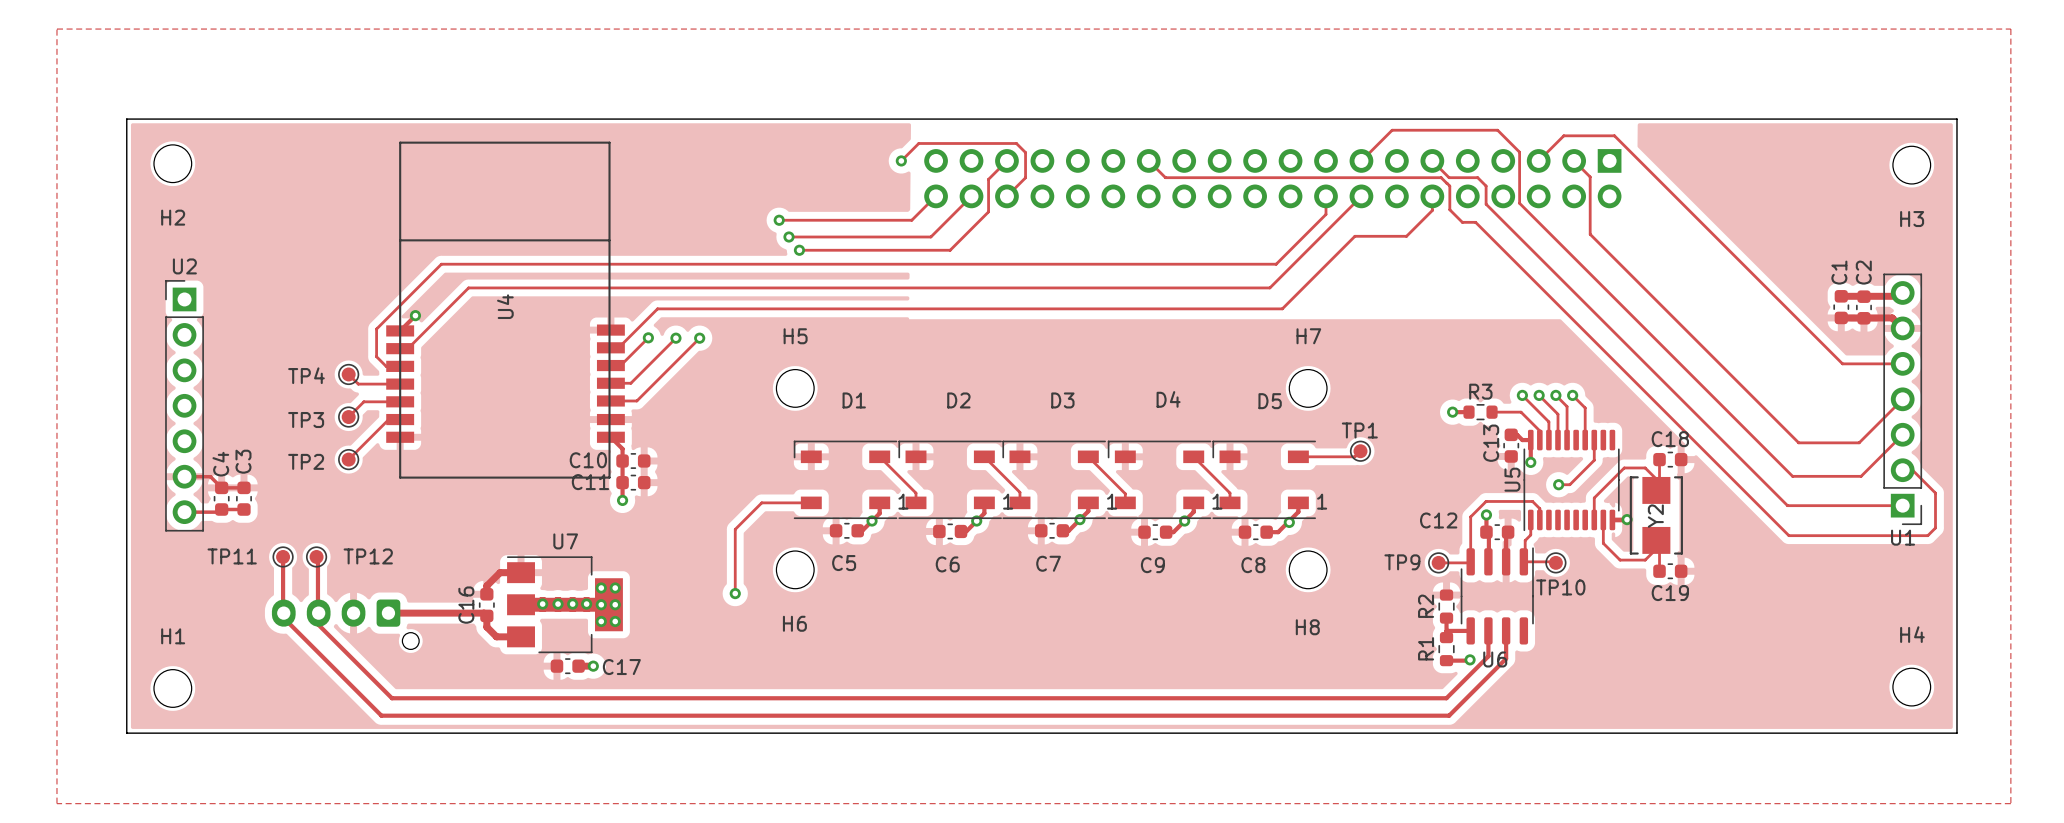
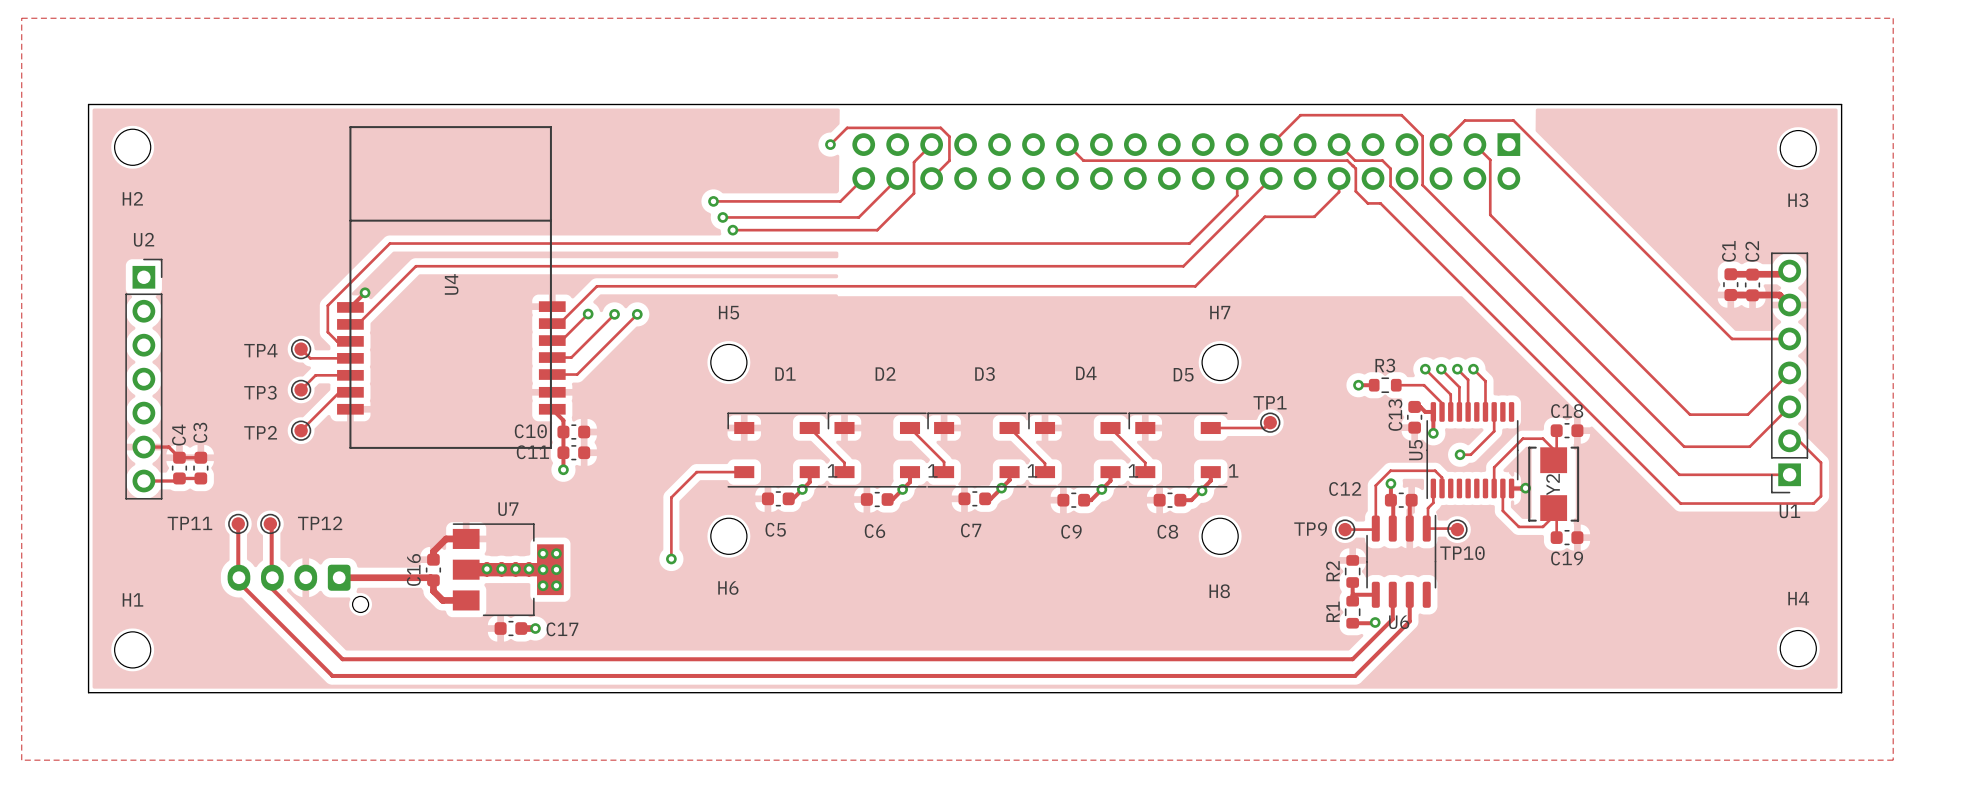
U1 footprint: [1883, 273, 1923, 526] -> [1771, 252, 1809, 494]
U2 footprint: [165, 280, 204, 532] -> [125, 258, 163, 500]

